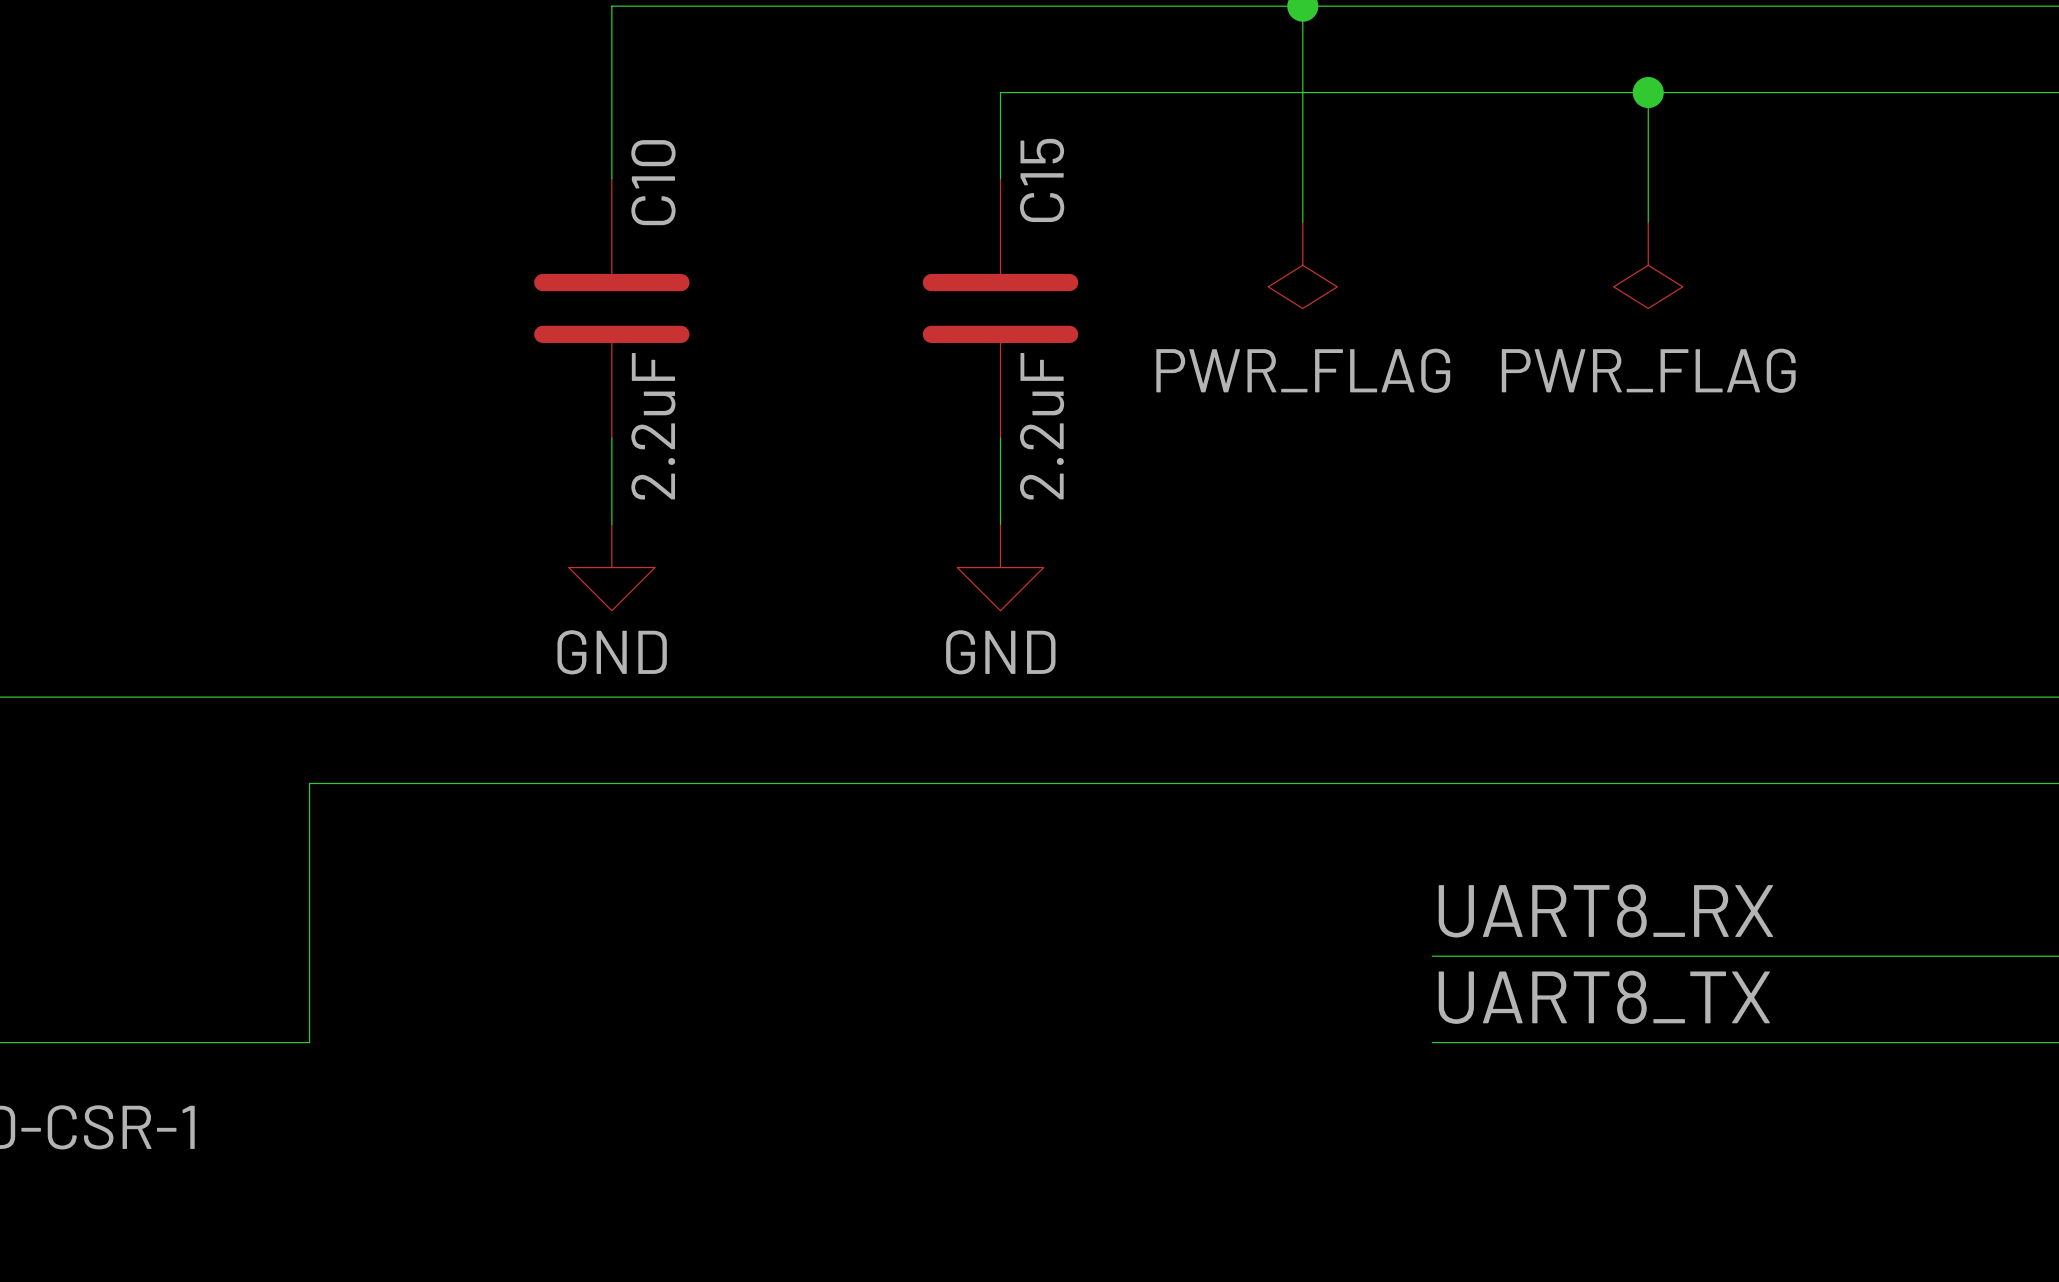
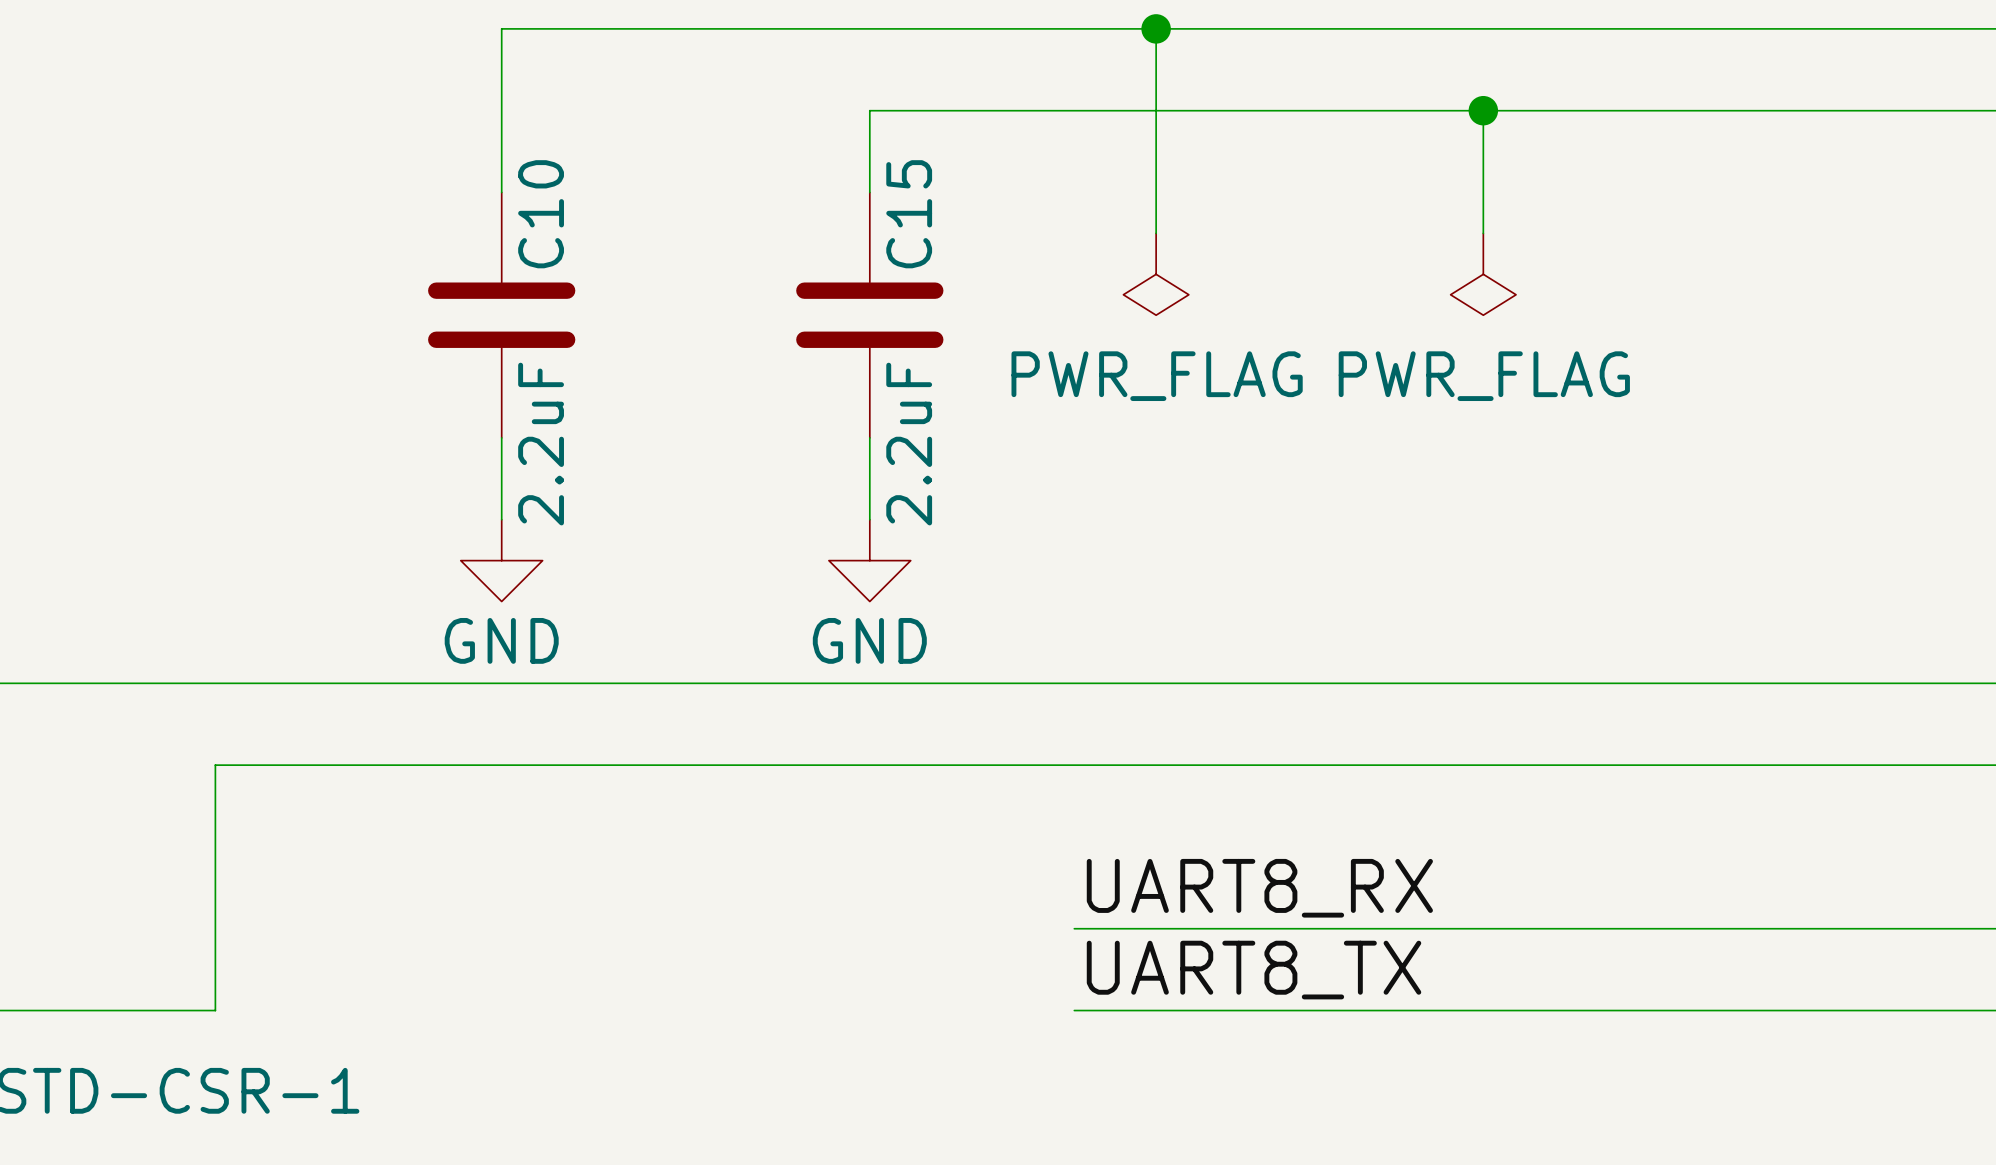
label position: UART8_RX (1605, 910) -> UART8_RX (1259, 888)
wire: none -> (1074, 928) (1278, 928)
label position: UART8_TX (1604, 997) -> UART8_TX (1254, 970)
wire: none -> (1074, 1010) (1278, 1010)

